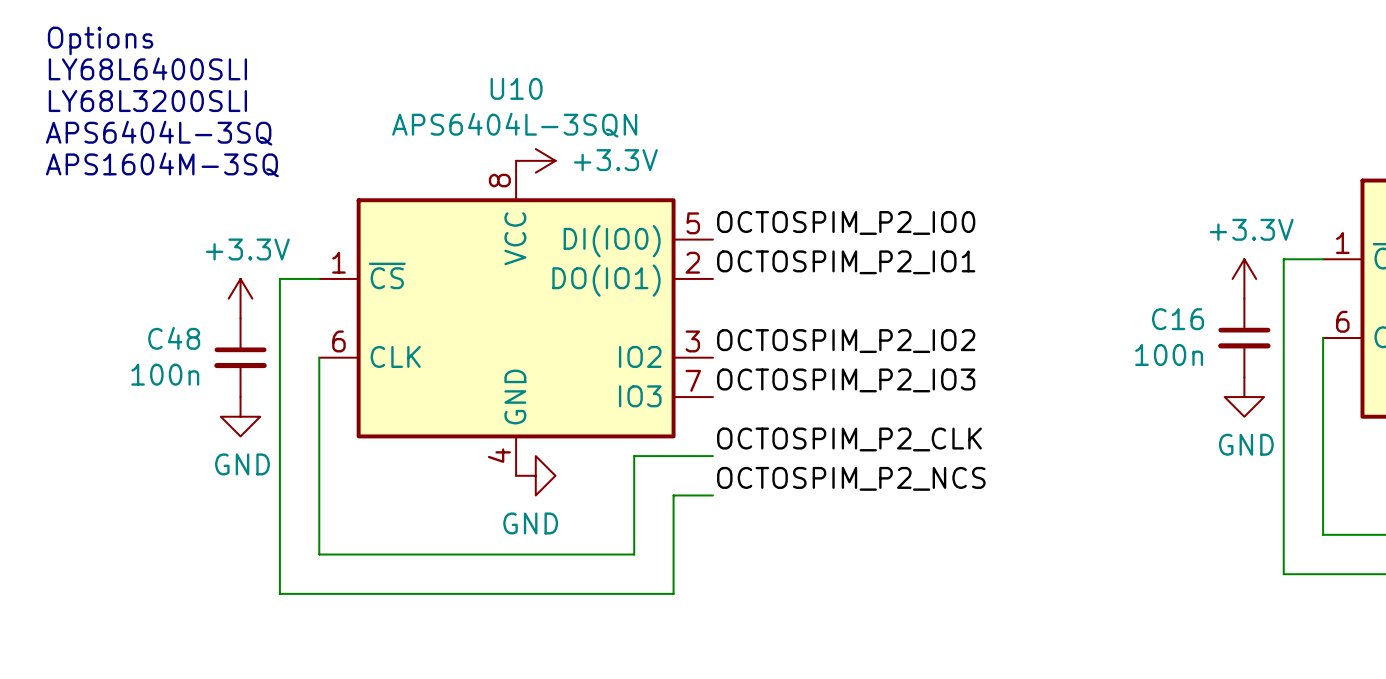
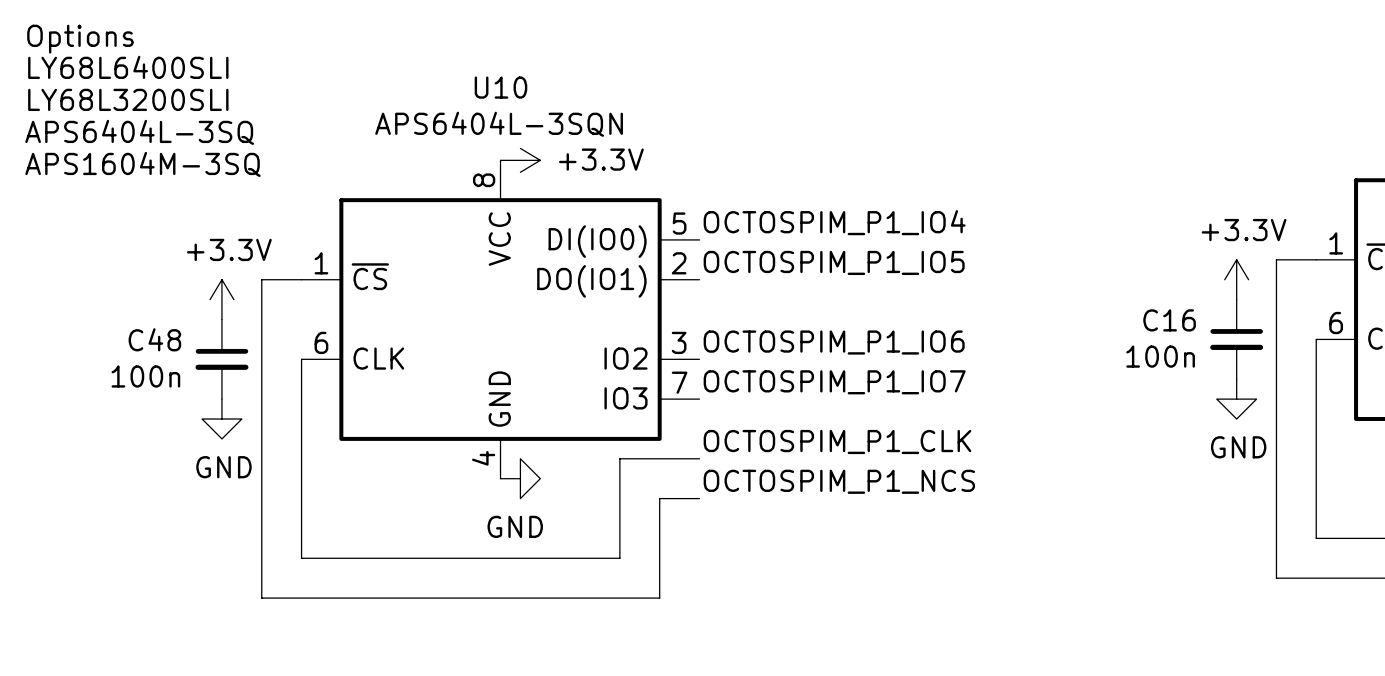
label: OCTOSPIM_P2_IO0 (846, 222) -> OCTOSPIM_P1_IO4 (834, 222)
label: OCTOSPIM_P2_IO1 (846, 262) -> OCTOSPIM_P1_IO5 (834, 262)
label: OCTOSPIM_P2_IO2 (846, 341) -> OCTOSPIM_P1_IO6 (834, 342)
label: OCTOSPIM_P2_IO3 (846, 380) -> OCTOSPIM_P1_IO7 (834, 382)
label: OCTOSPIM_P2_CLK (849, 439) -> OCTOSPIM_P1_CLK (837, 441)
label: OCTOSPIM_P2_NCS (851, 478) -> OCTOSPIM_P1_NCS (839, 481)

